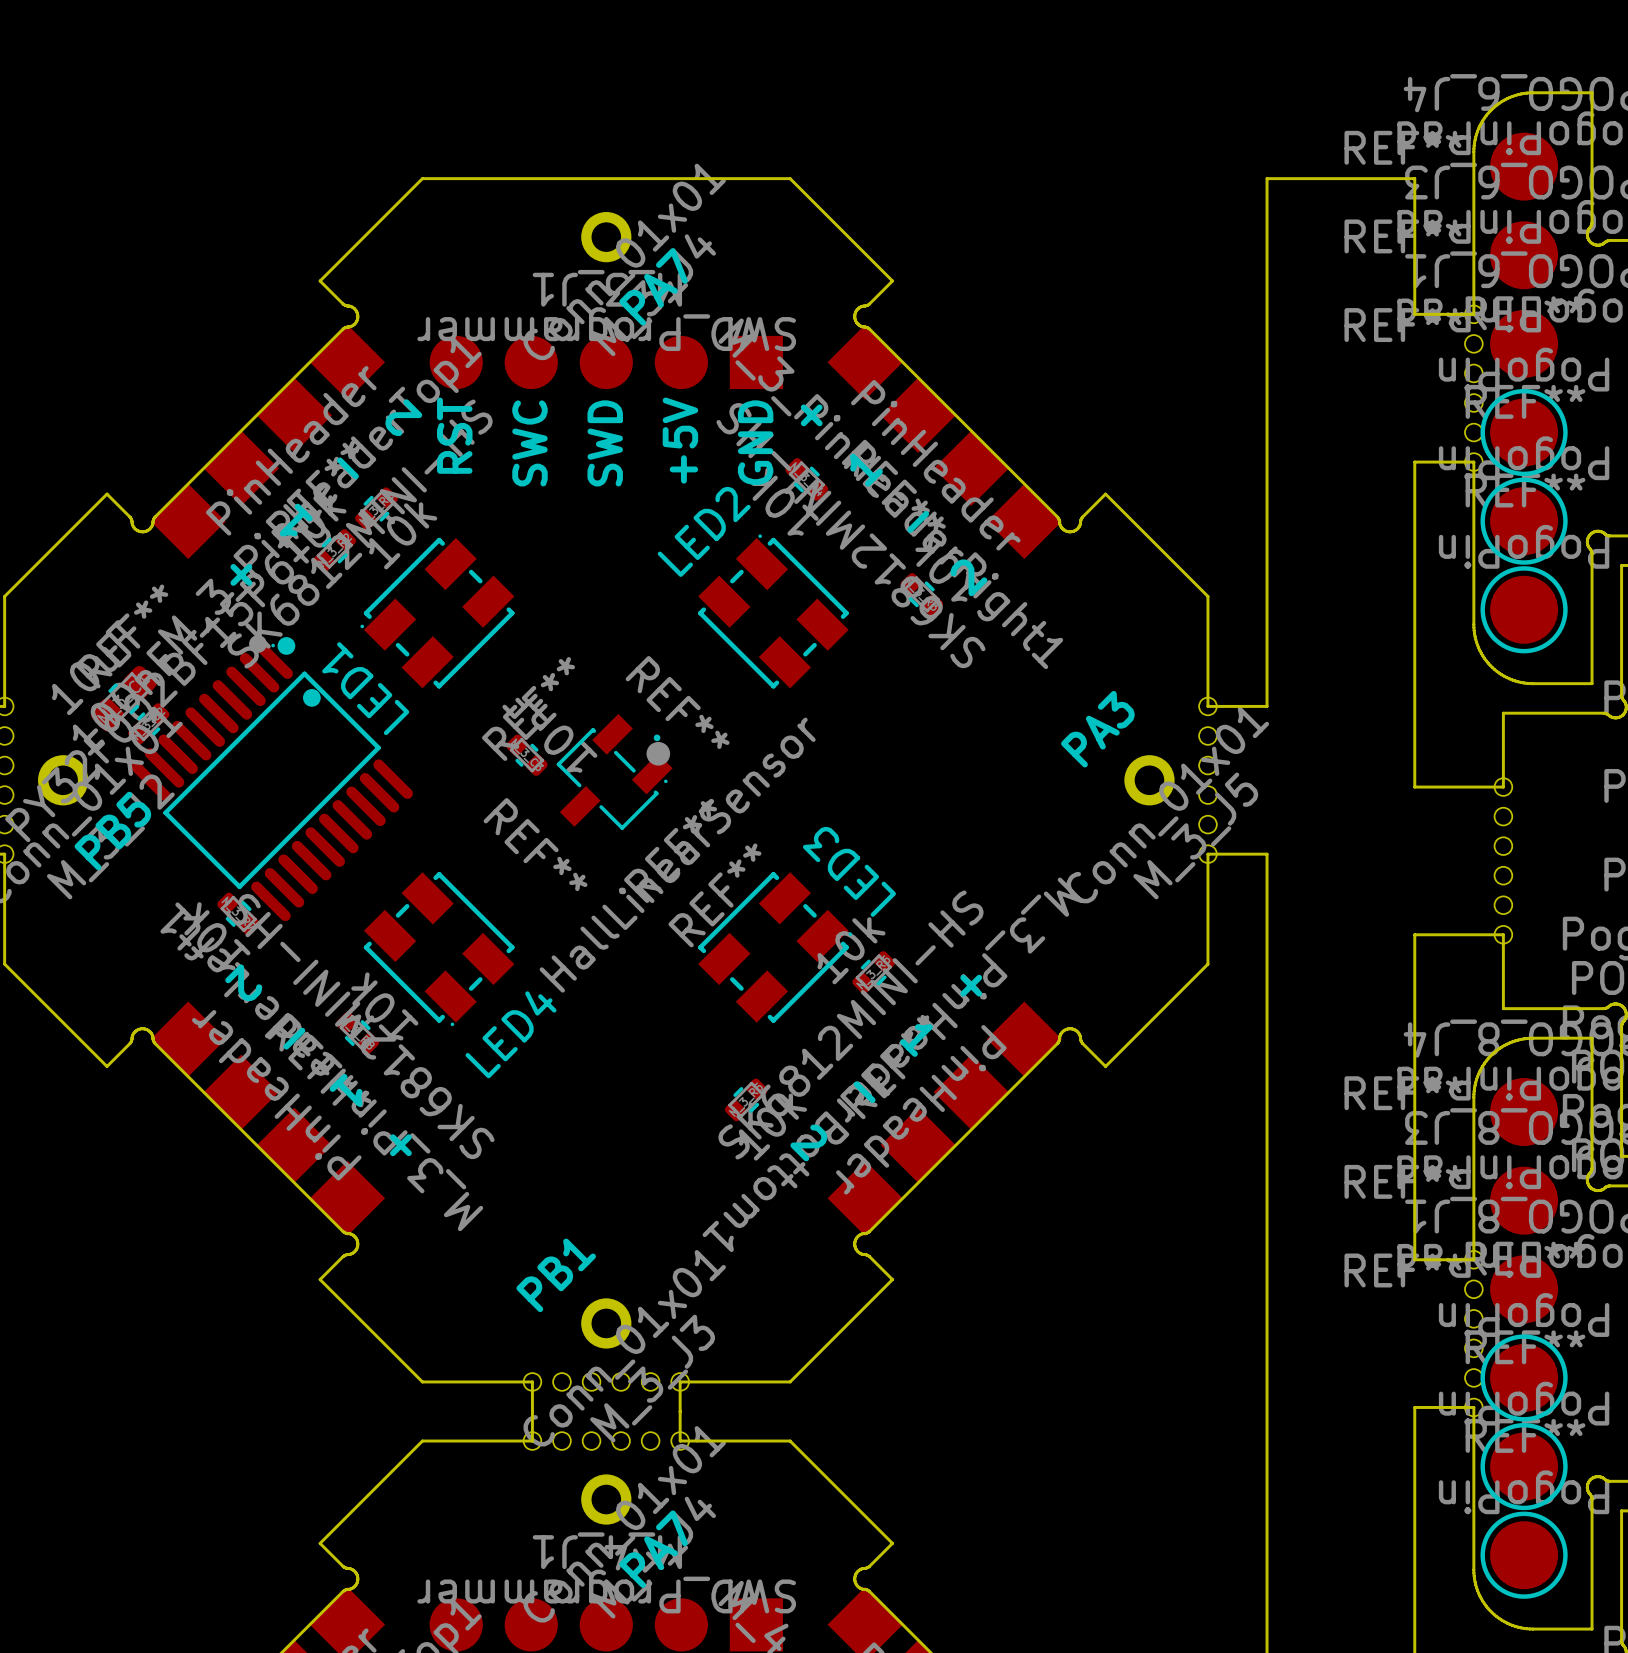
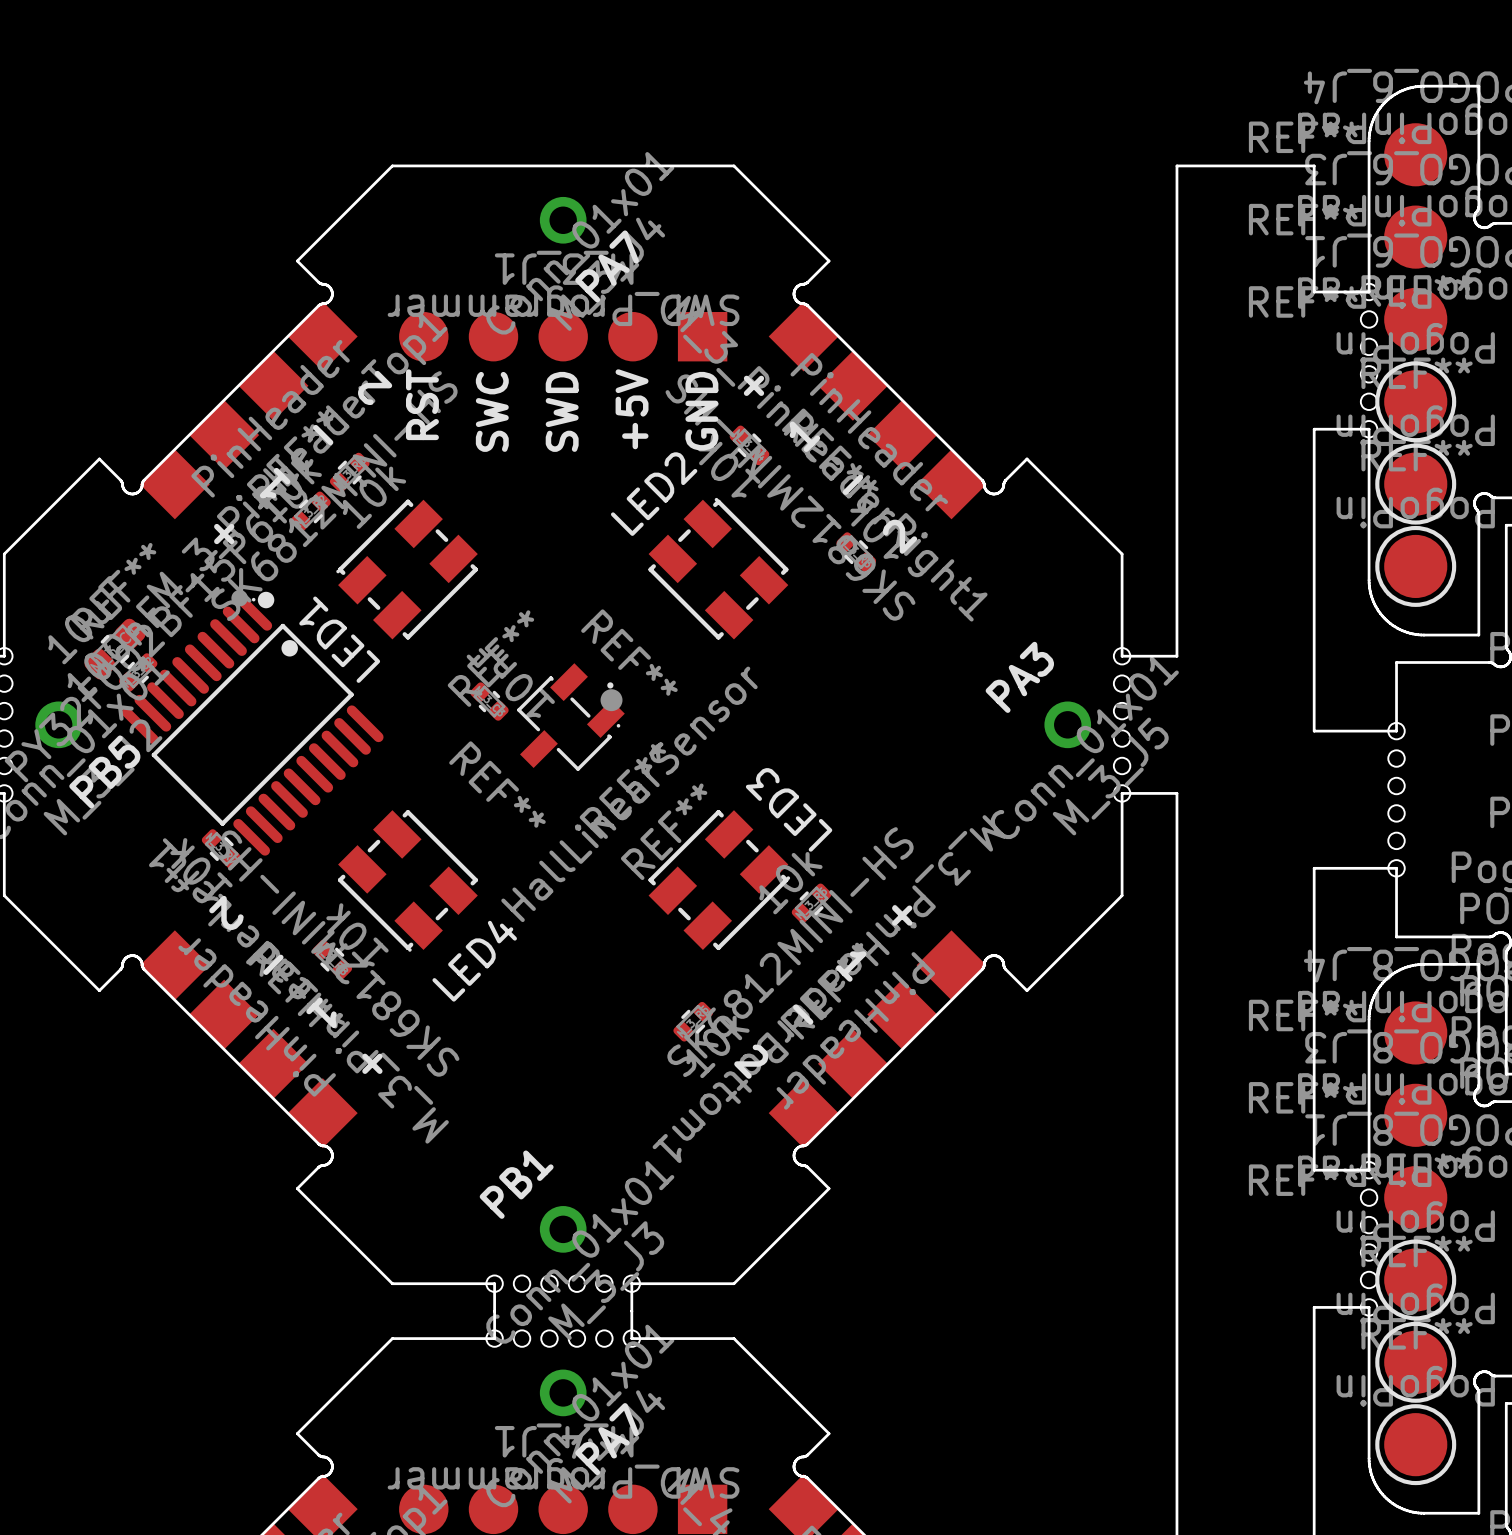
part footprint: [698, 534, 849, 689] -> [648, 498, 789, 640]
part footprint: [360, 537, 515, 689] -> [336, 499, 478, 640]
part footprint: [363, 872, 515, 1027] -> [337, 810, 478, 952]
part footprint: [698, 872, 853, 1023] -> [648, 810, 790, 951]

